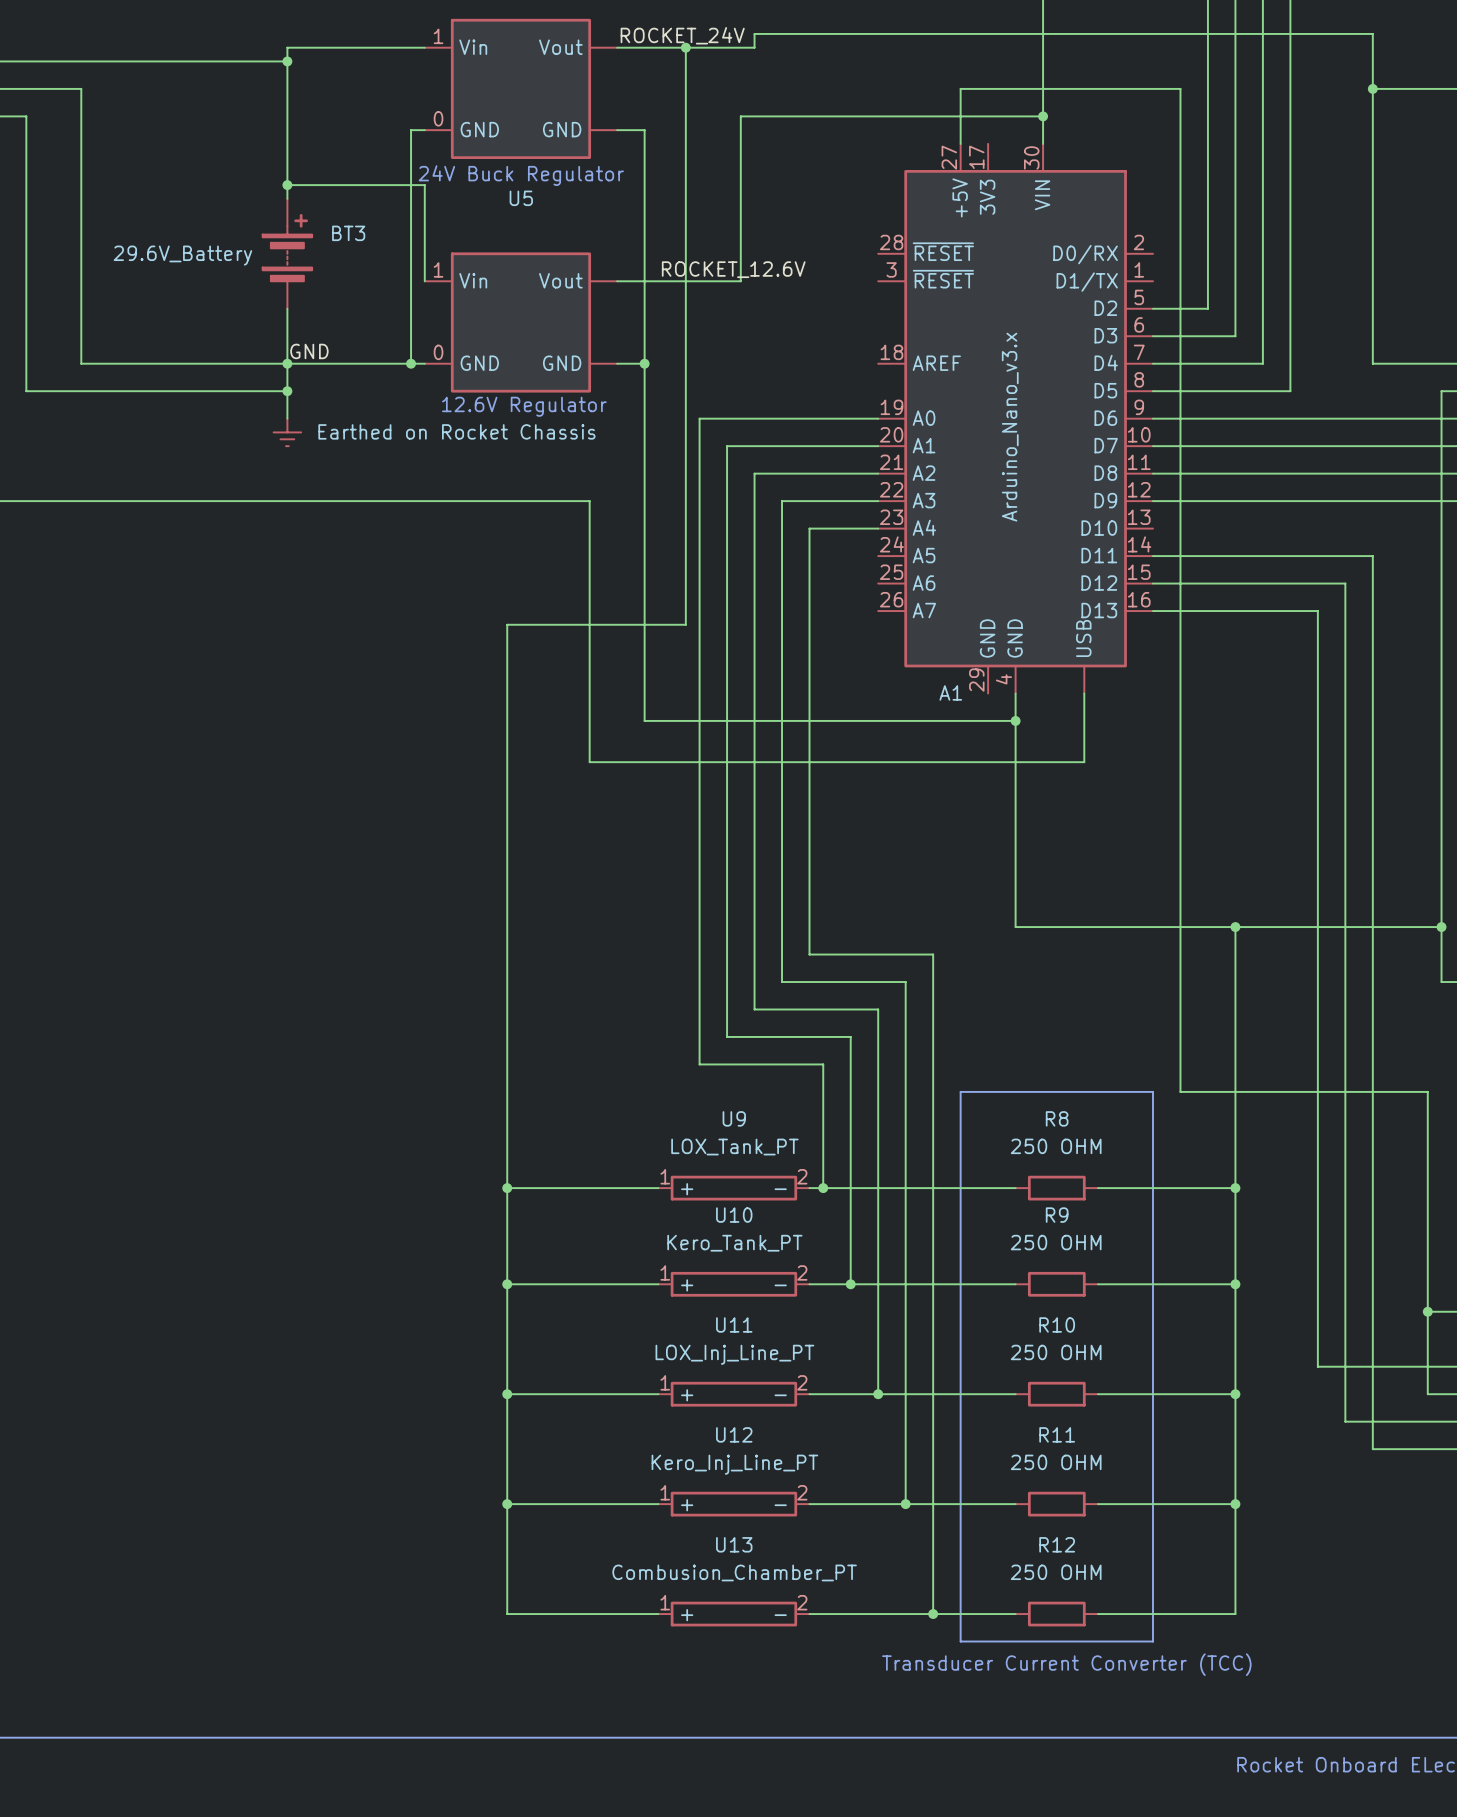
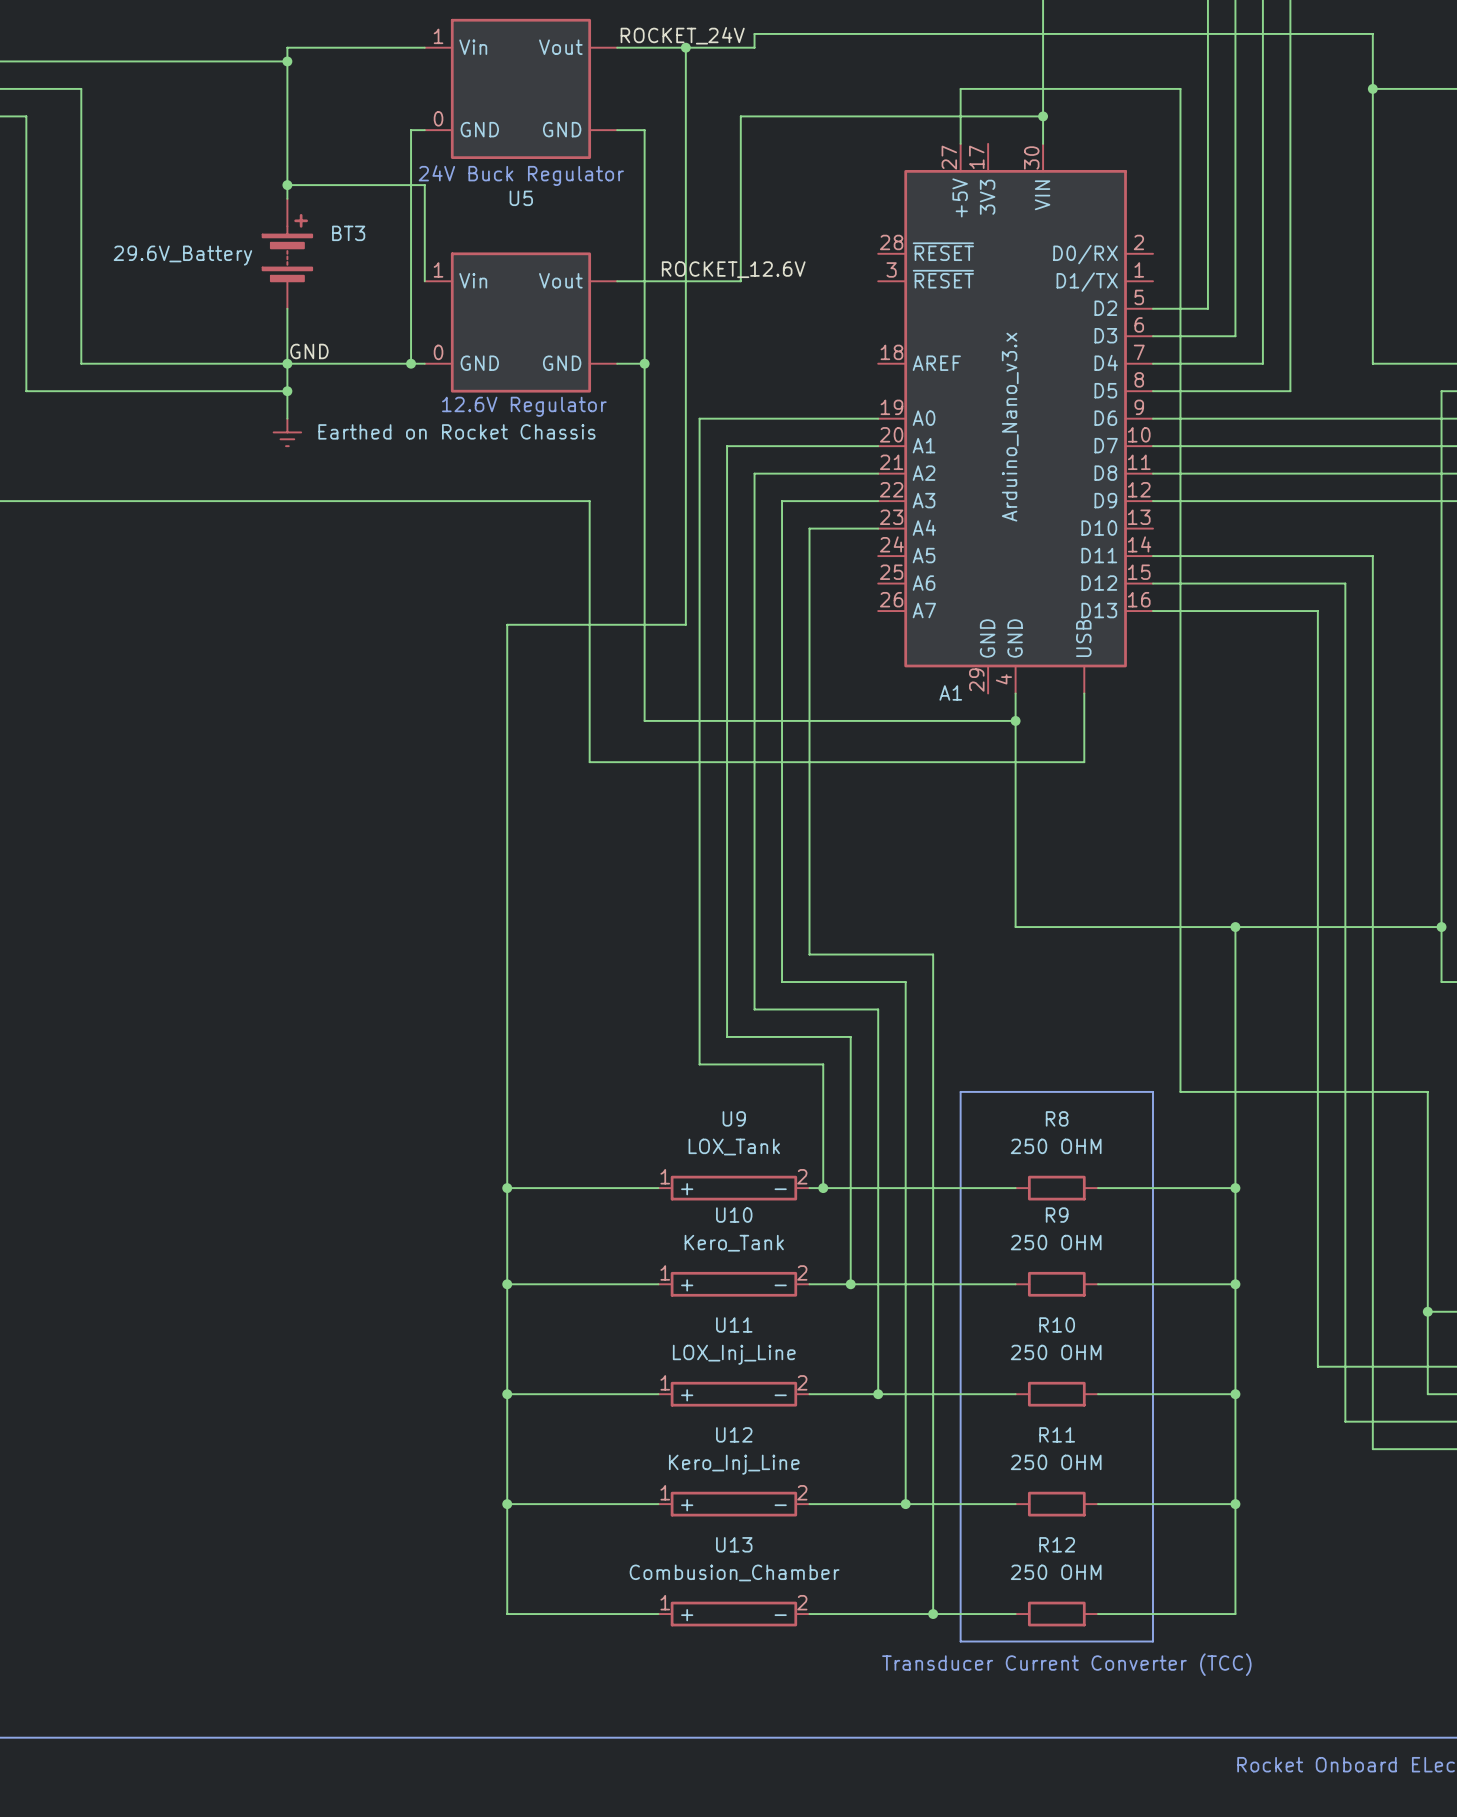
U9 value: LOX_Tank_PT (734, 1147) -> LOX_Tank (734, 1147)
U10 value: Kero_Tank_PT (734, 1243) -> Kero_Tank (734, 1243)
U11 value: LOX_Inj_Line_PT (734, 1354) -> LOX_Inj_Line (734, 1354)
U12 value: Kero_Inj_Line_PT (734, 1464) -> Kero_Inj_Line (734, 1464)
U13 value: Combusion_Chamber_PT (734, 1572) -> Combusion_Chamber (734, 1572)

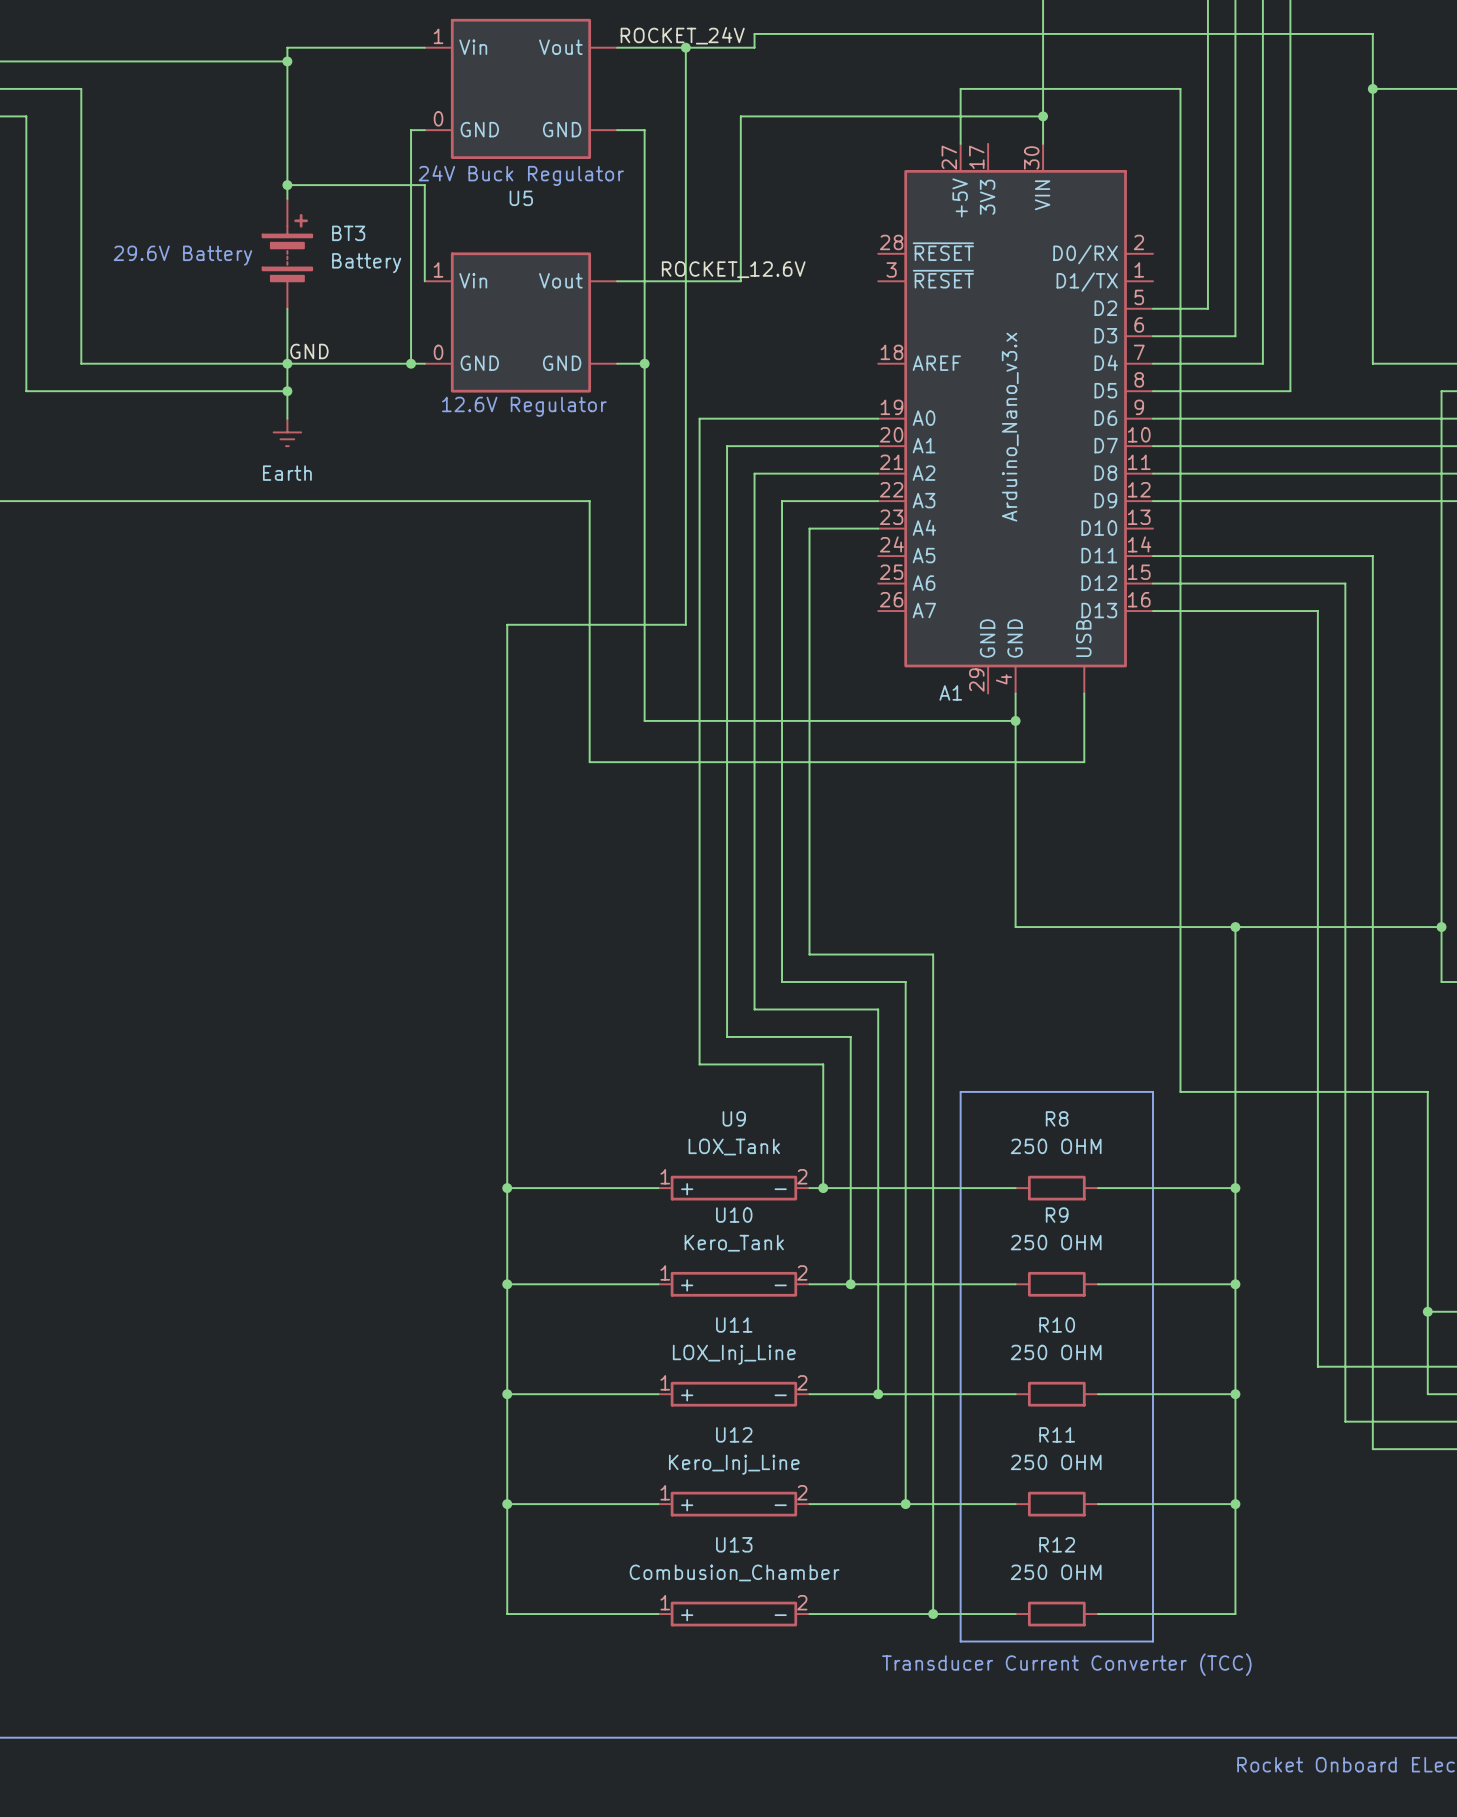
BT3 value: 29.6V_Battery (182, 255) -> Battery (366, 263)
text: none -> 29.6V Battery (182, 255)
power symbol: Earthed on Rocket Chassis (287, 432) -> Earth (287, 432)

